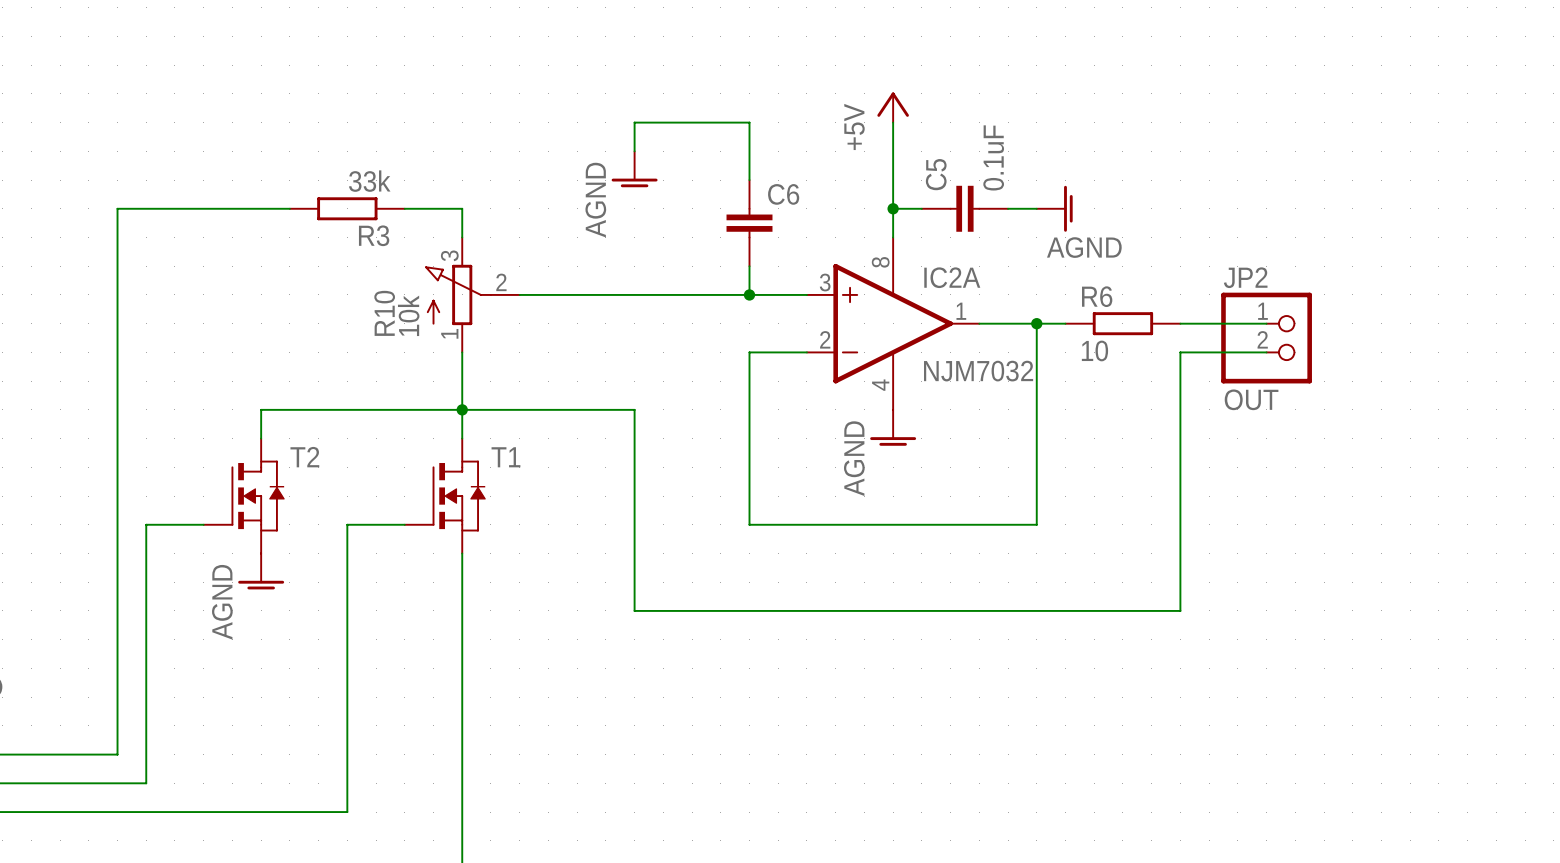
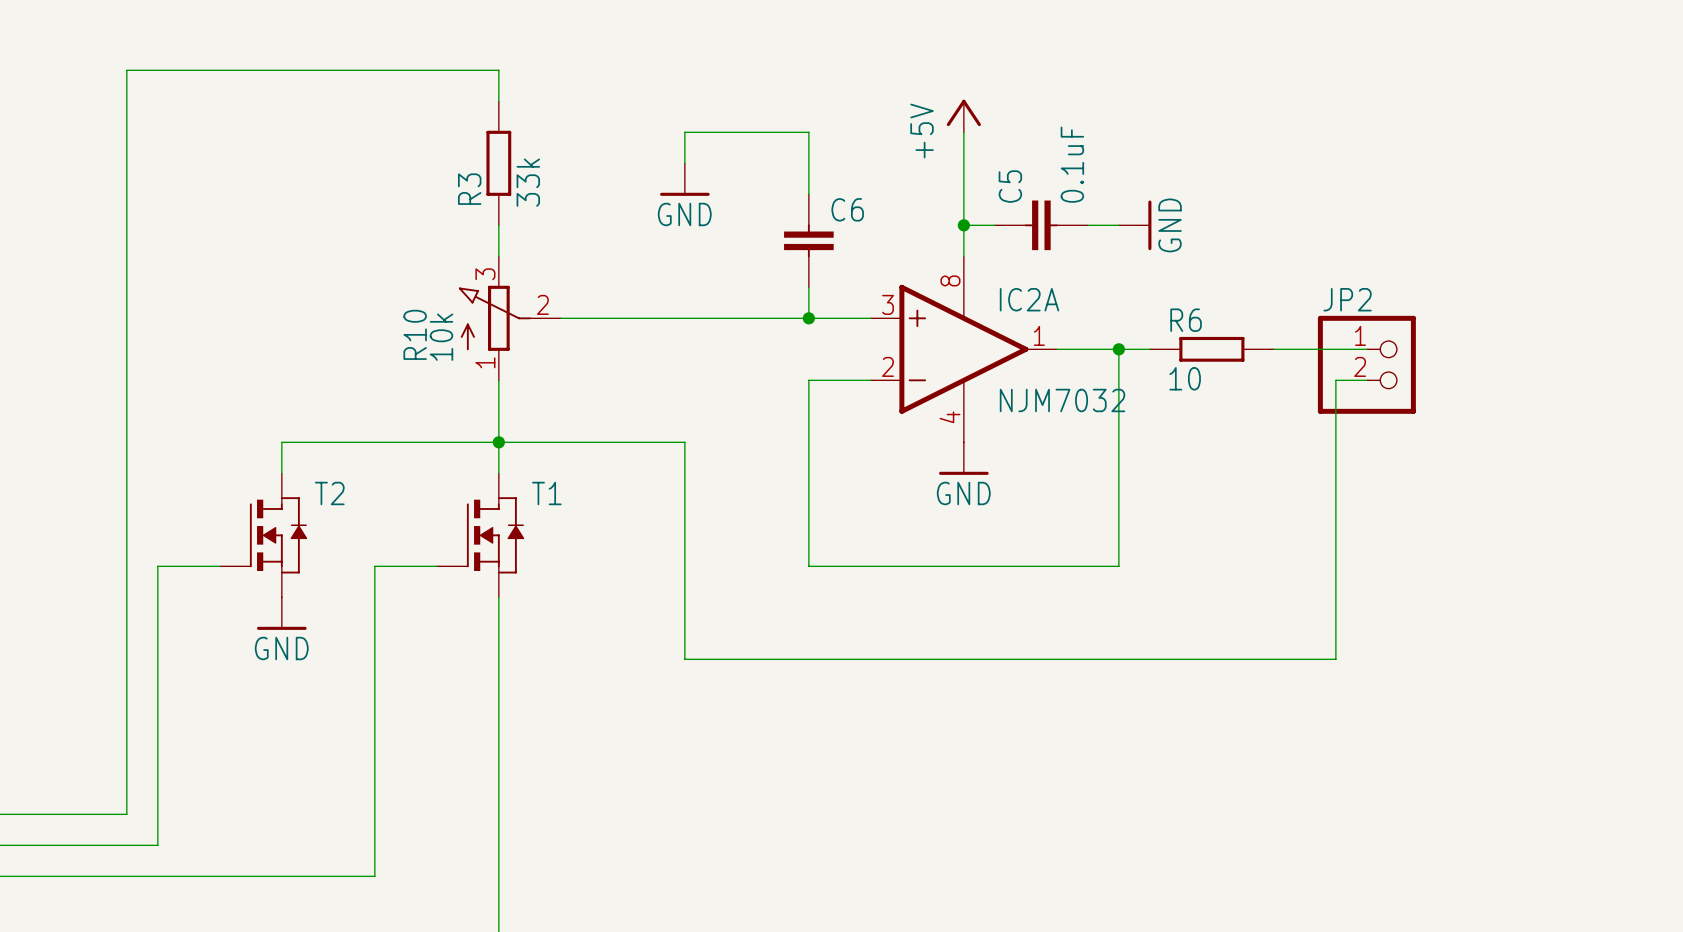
power symbol: AGND (634, 169) -> GND (684, 179)
wire: (117, 208) (289, 208) -> (126, 225) (126, 70) (498, 70) (498, 101)
R3 rotation: 0° (347, 208) -> 90° clockwise (498, 163)
R3 position: (347, 208) -> (498, 163)
wire: (404, 208) (462, 208) -> none
power symbol: AGND (1054, 208) -> GND (1135, 225)
wire: (1237, 352) (1180, 352) (1180, 610) -> (1335, 380) (1335, 659) (1273, 659)
JP2 value: OUT (1251, 399) -> none
power symbol: AGND (893, 427) -> GND (963, 458)
power symbol: AGND (261, 571) -> GND (281, 613)

